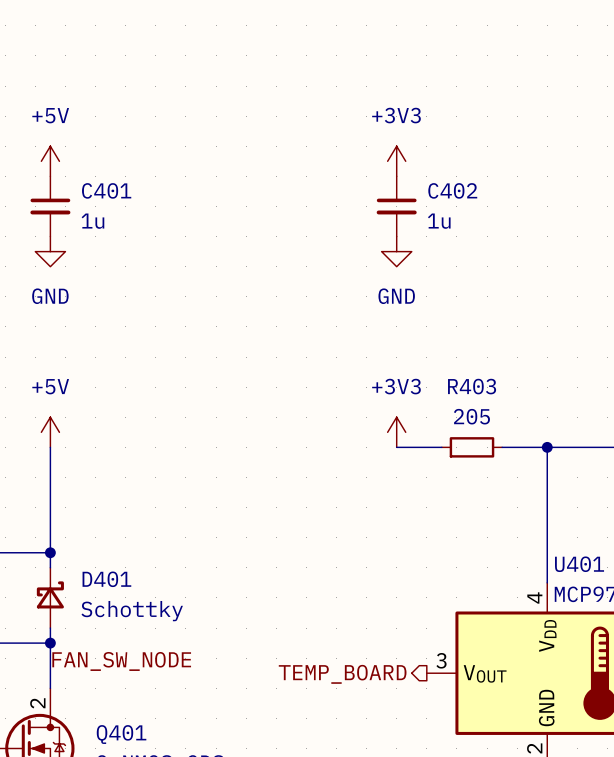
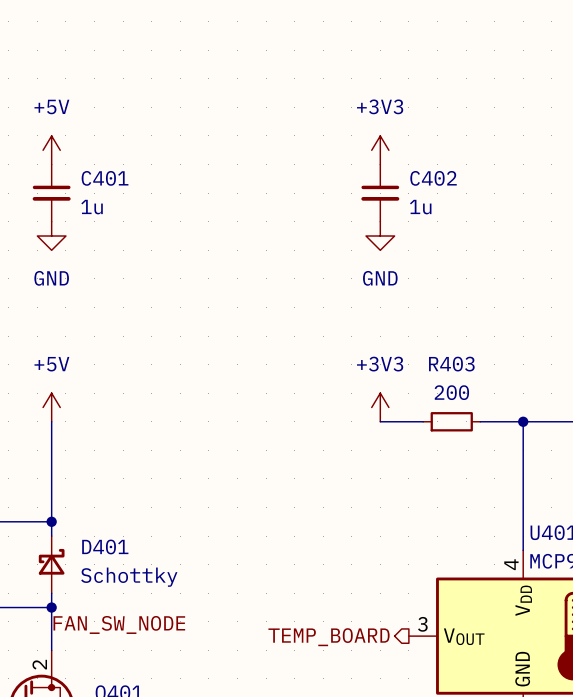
R403 value: 205 (471, 416) -> 200 (451, 392)

